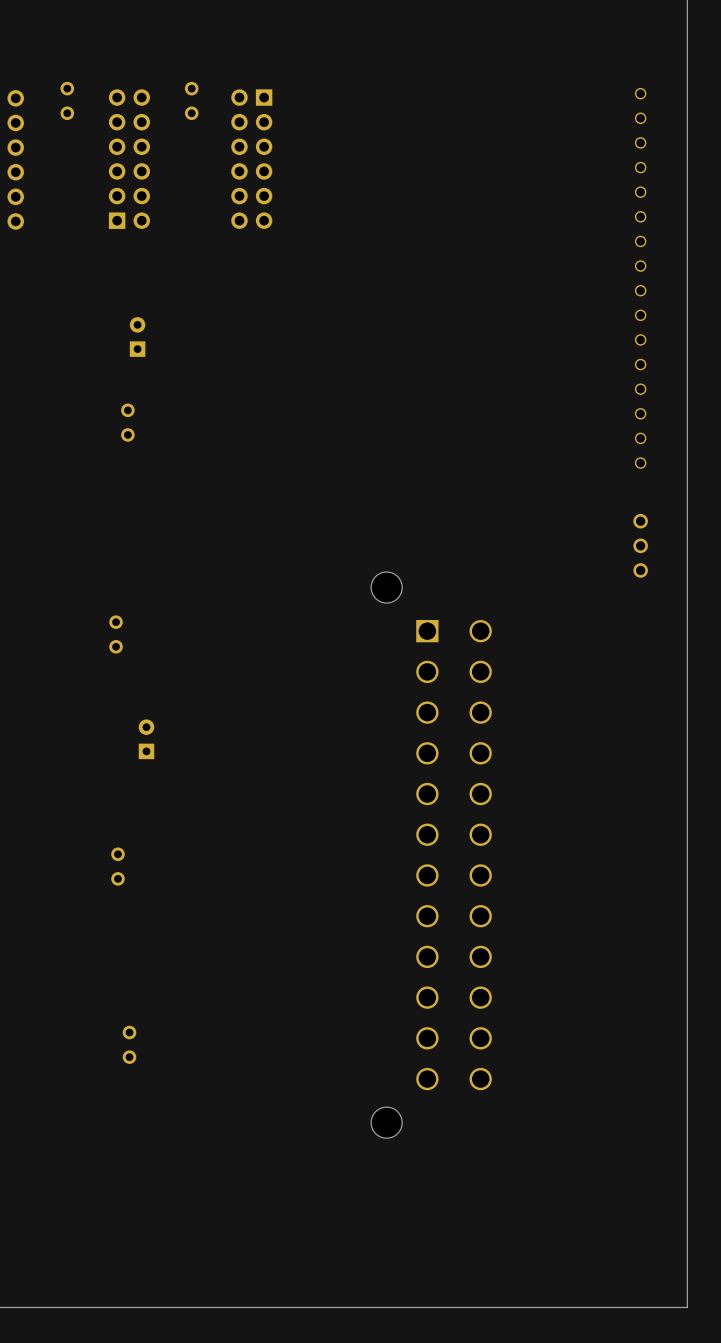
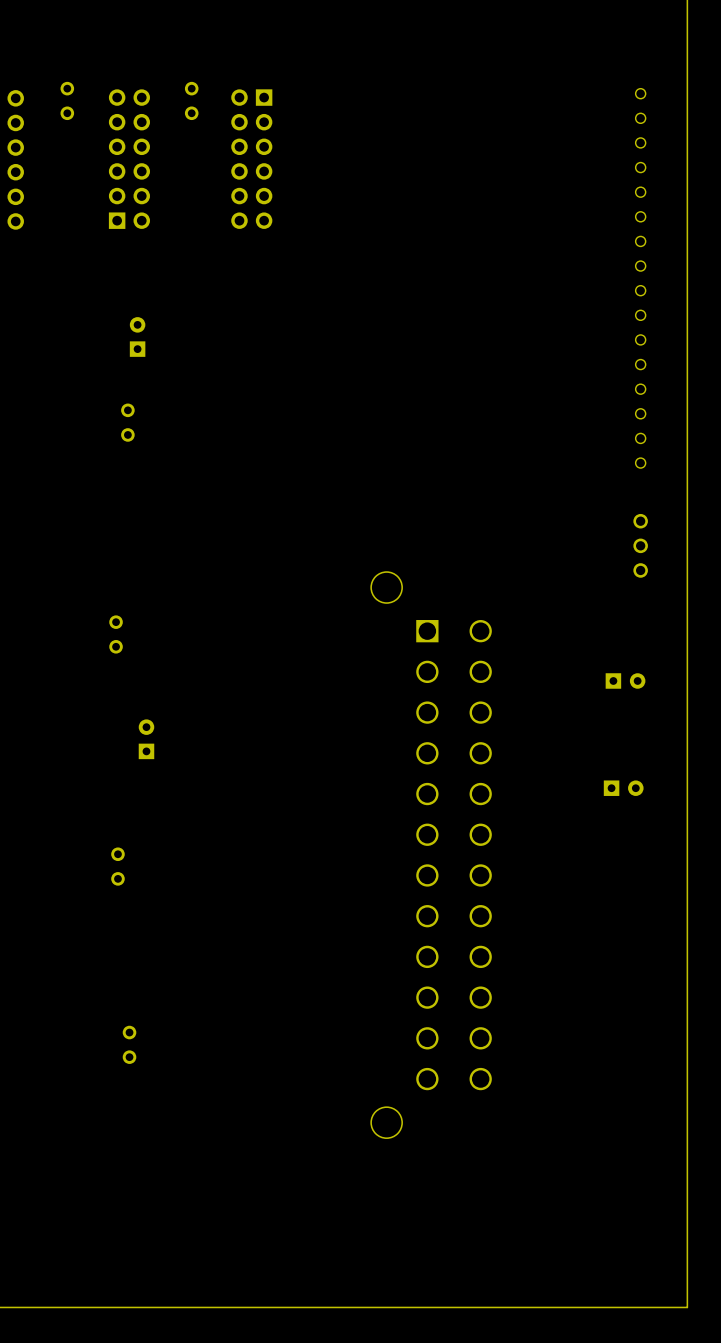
part: none -> (625, 680)
part: none -> (623, 788)

